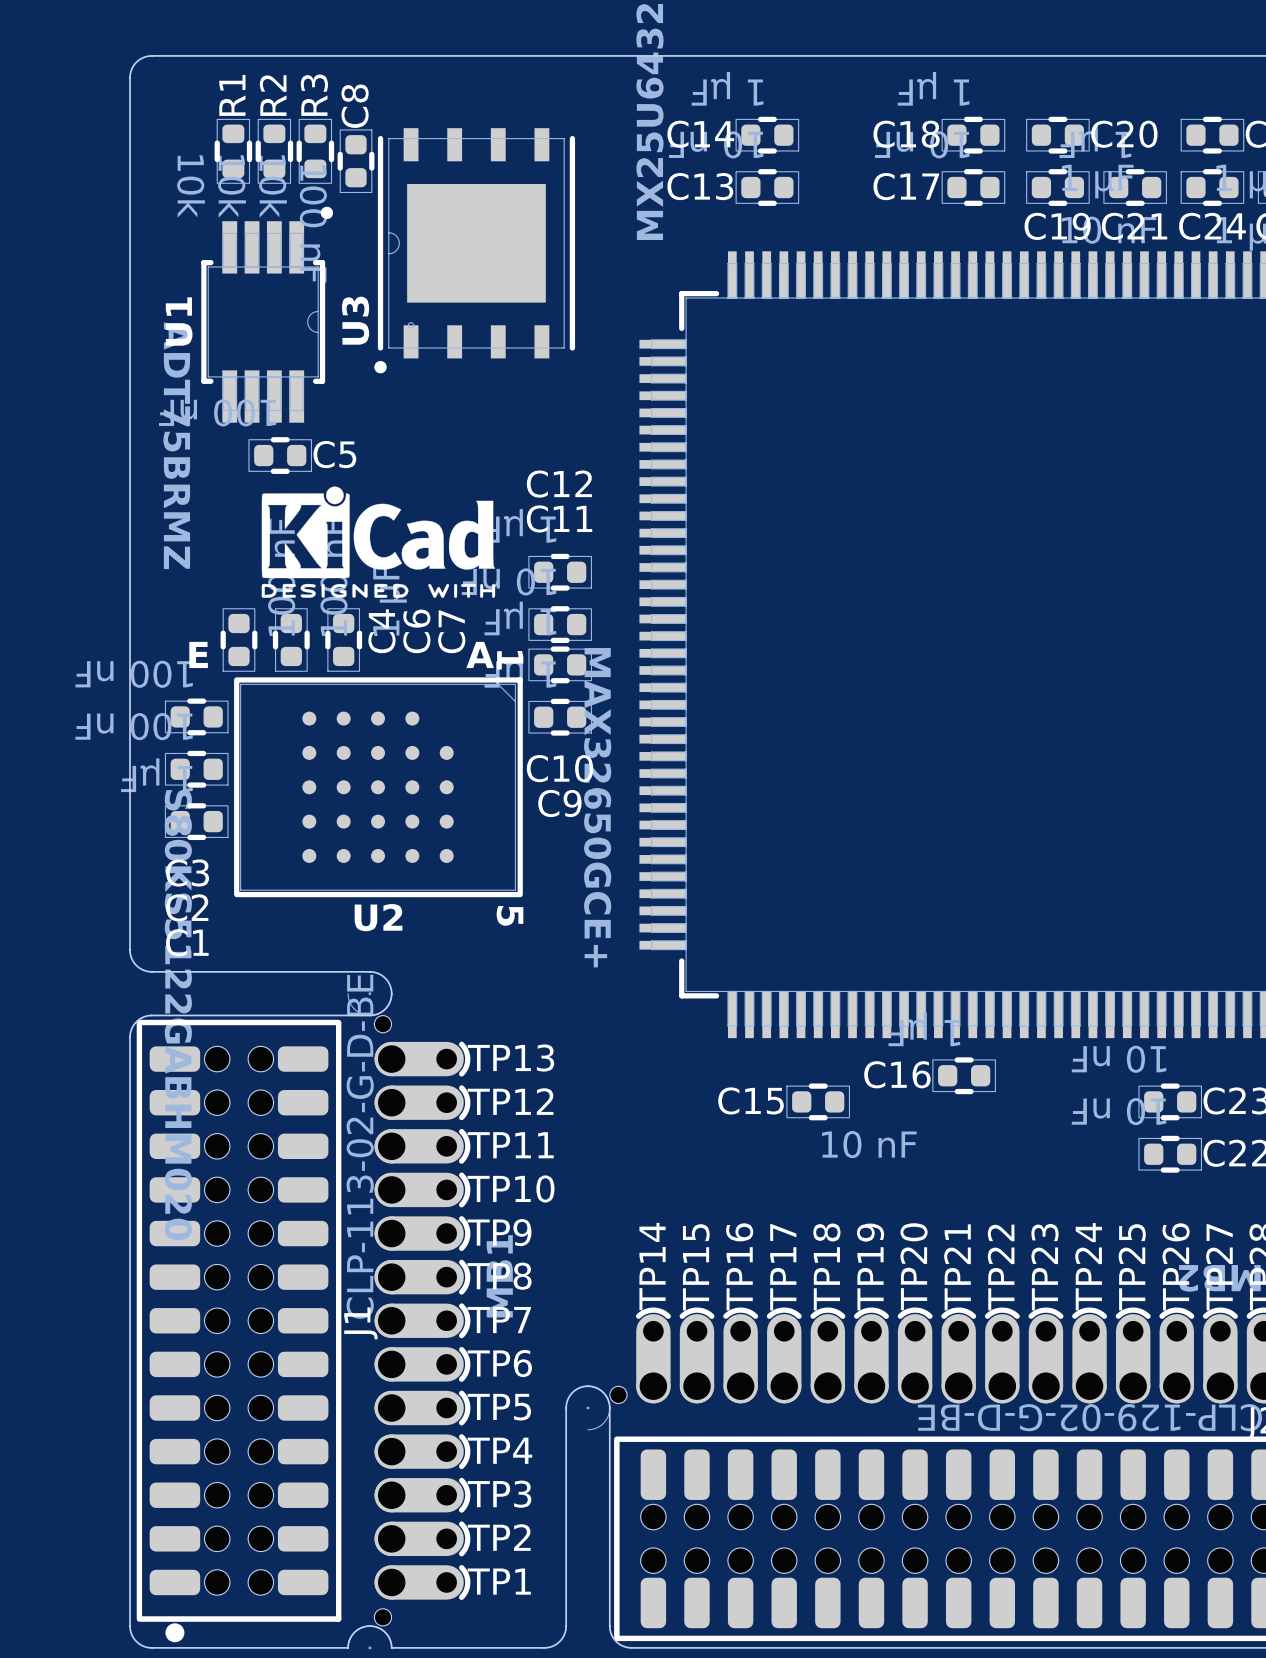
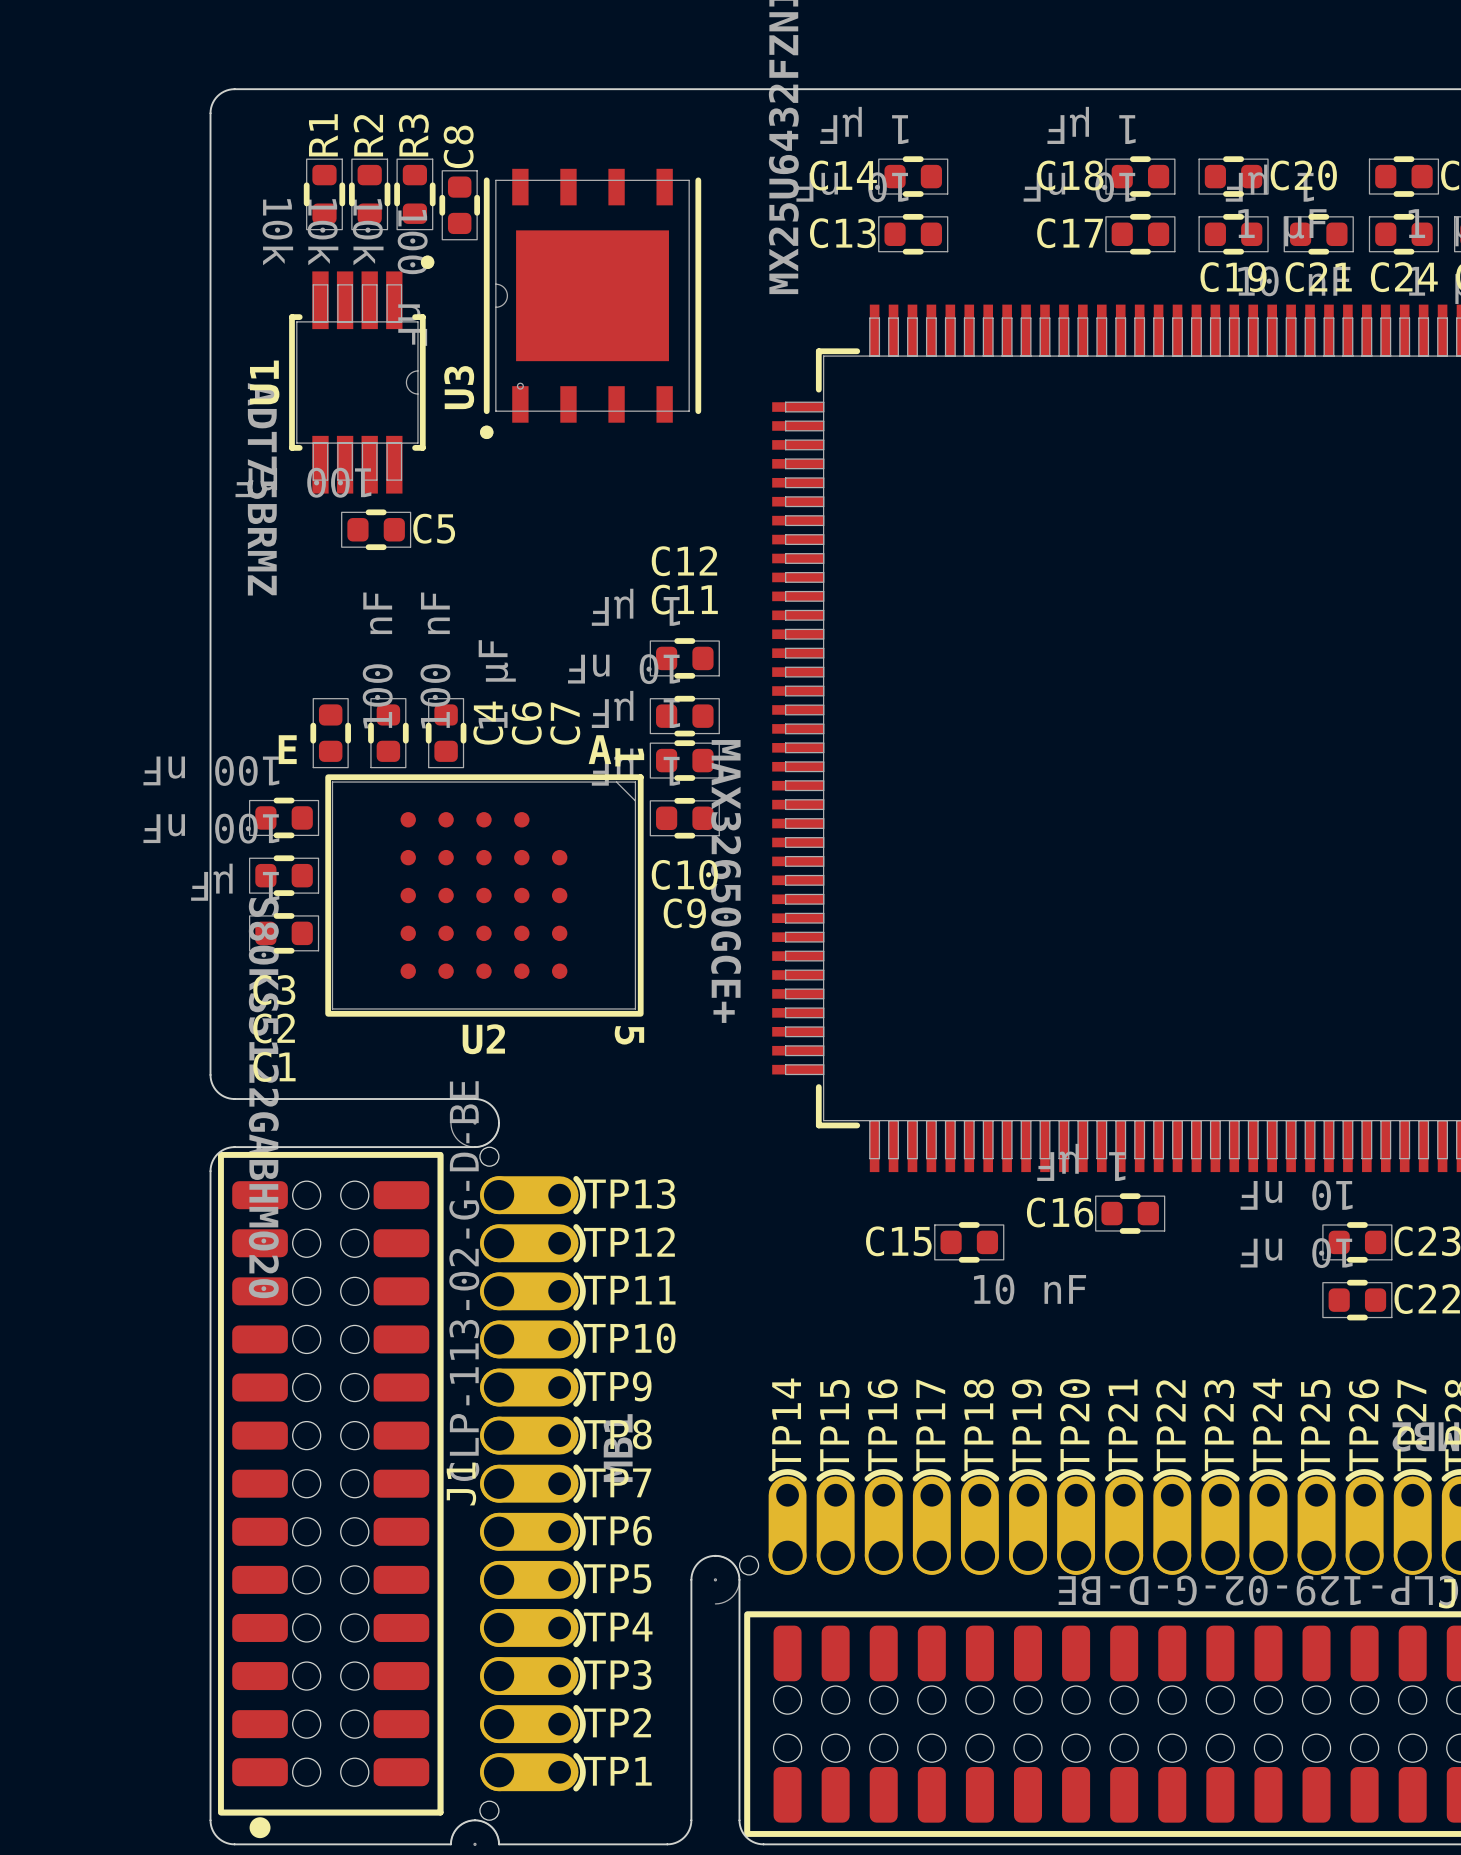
drawing: [261, 486, 496, 598] -> none

